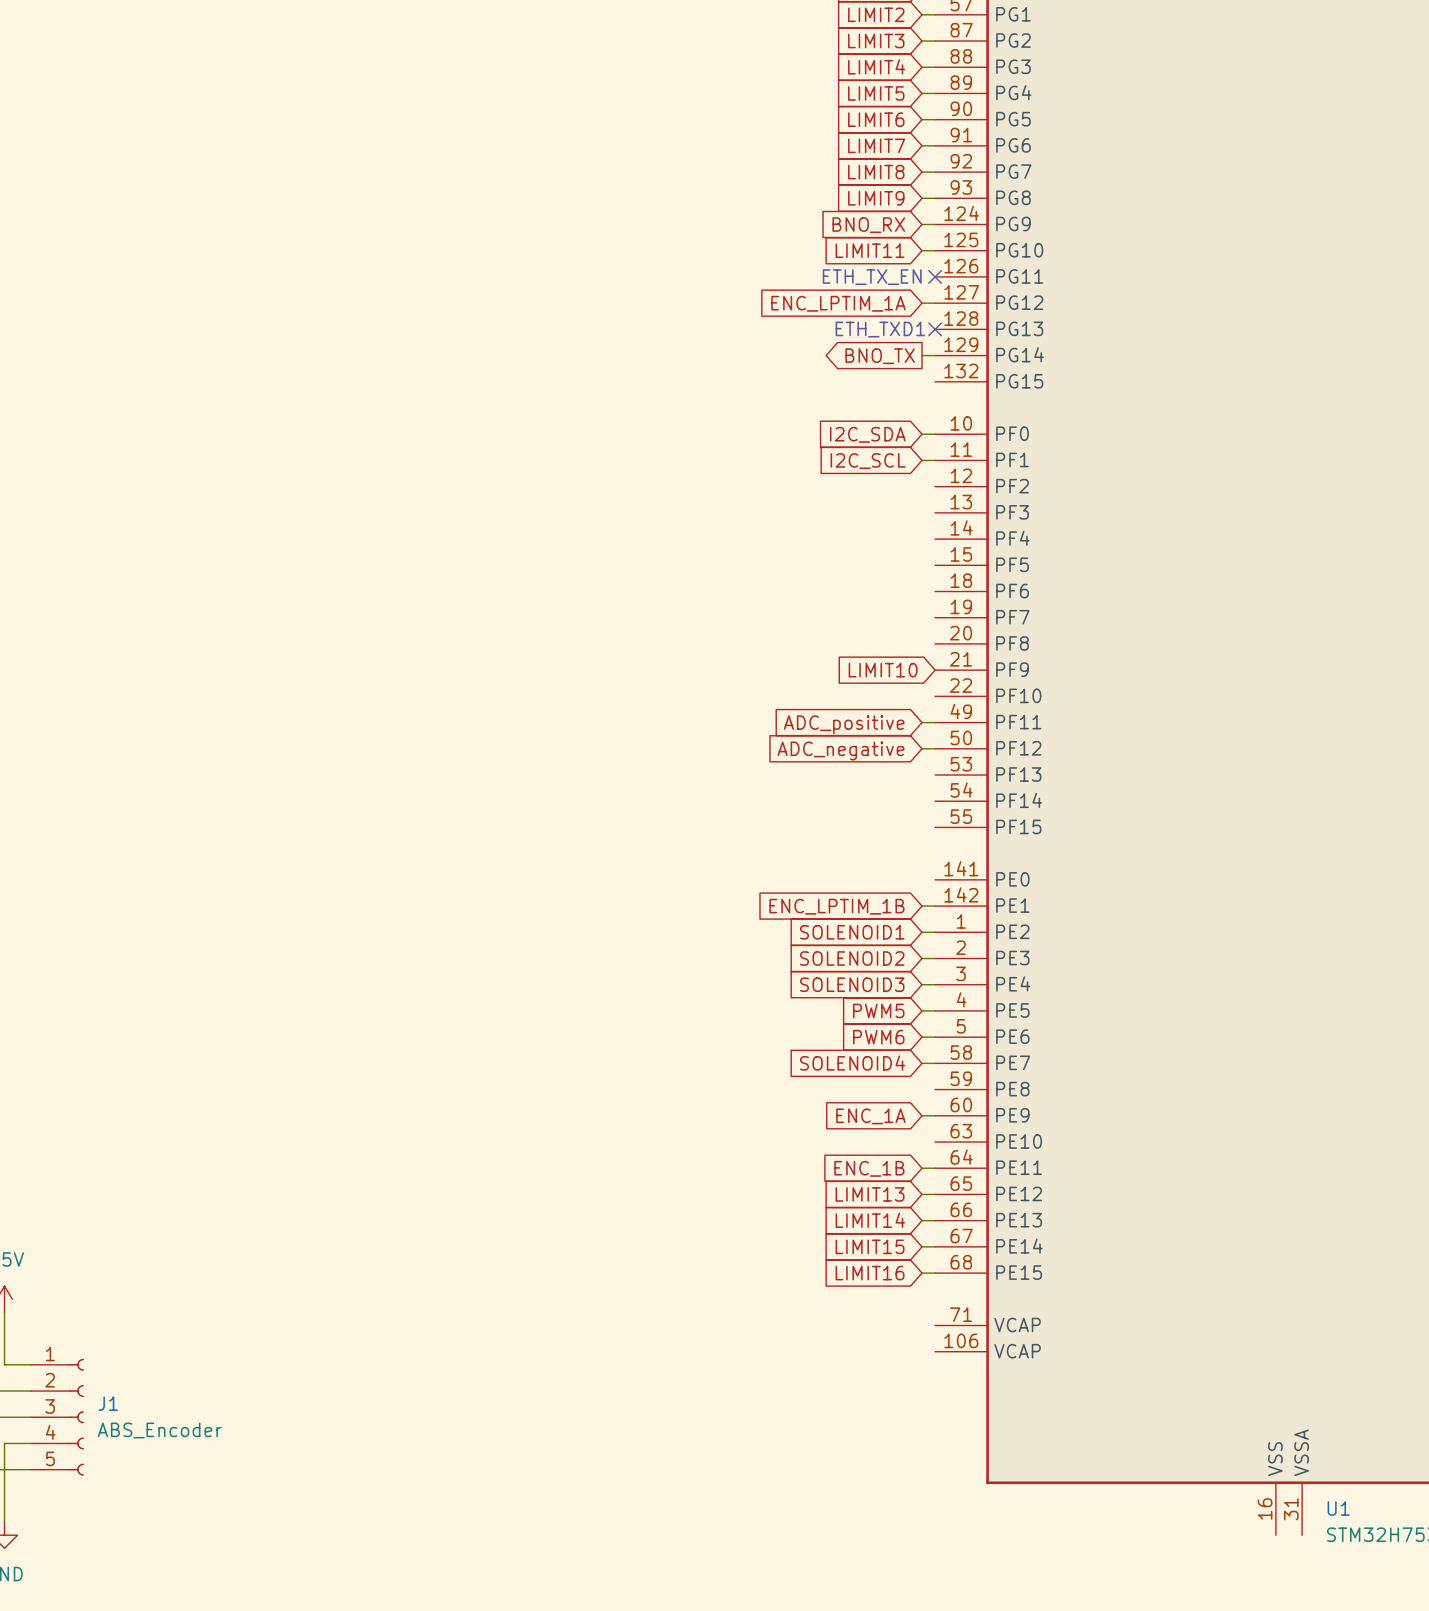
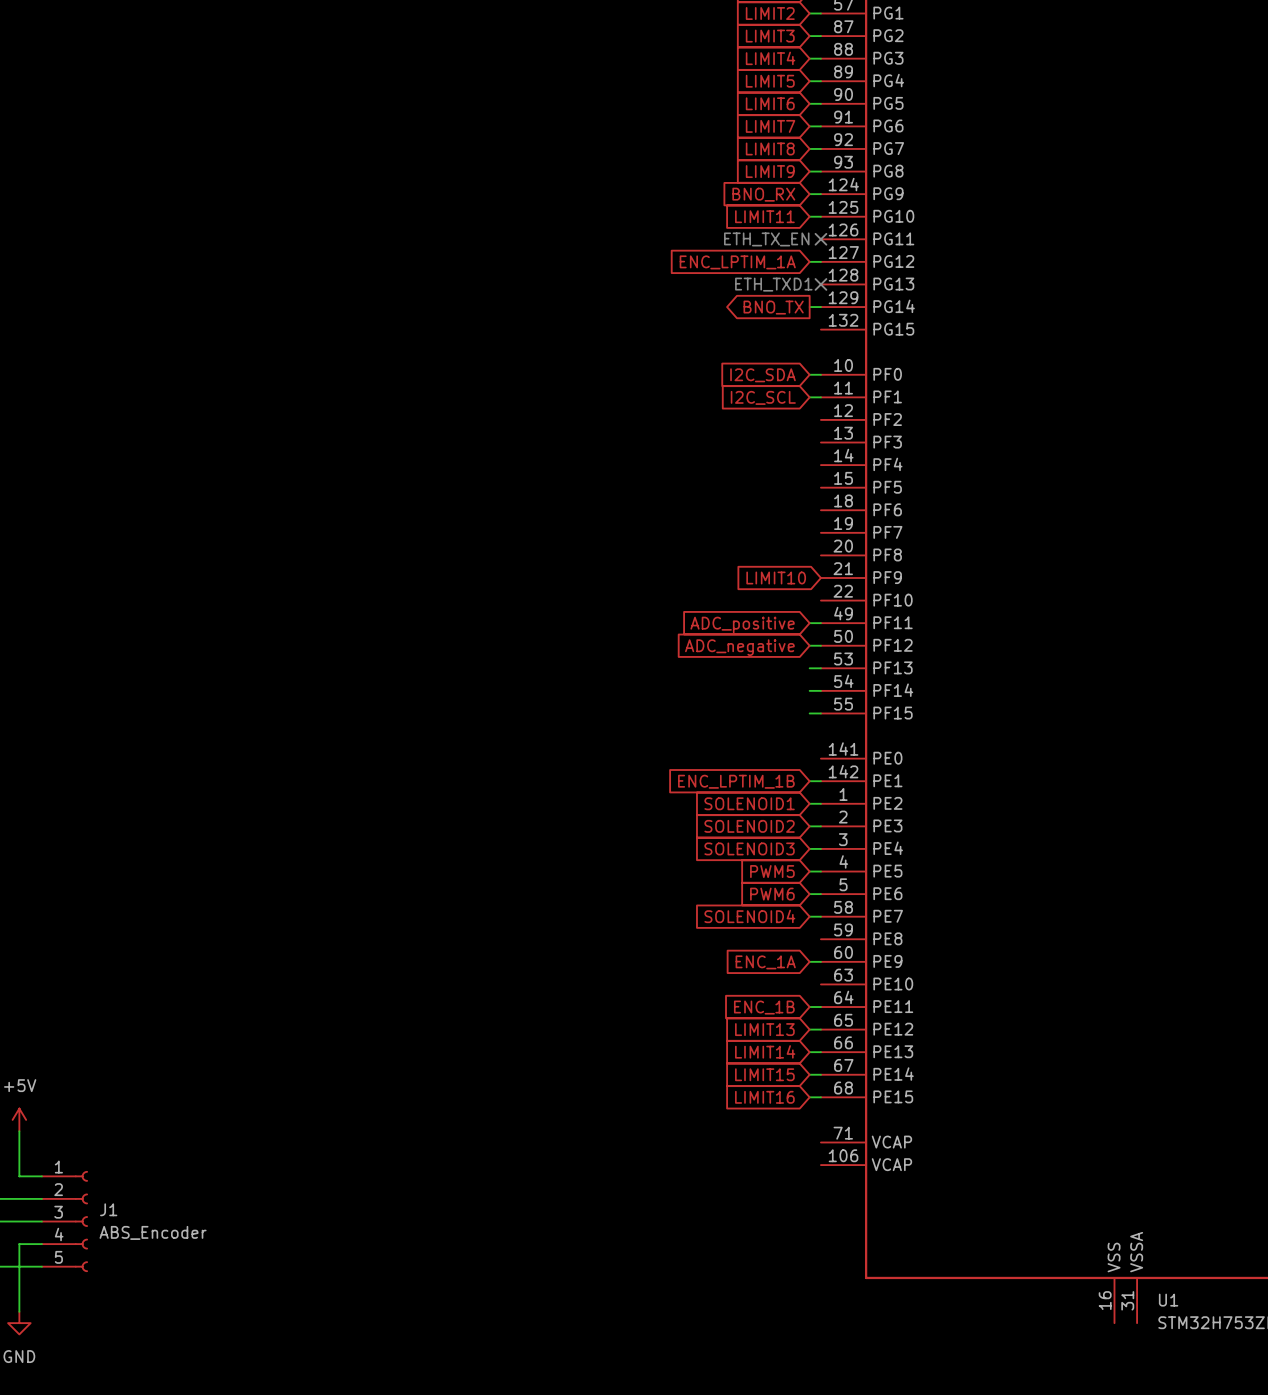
wire: none -> (809, 668) (820, 668)
wire: none -> (809, 690) (820, 690)
wire: none -> (809, 713) (820, 713)

